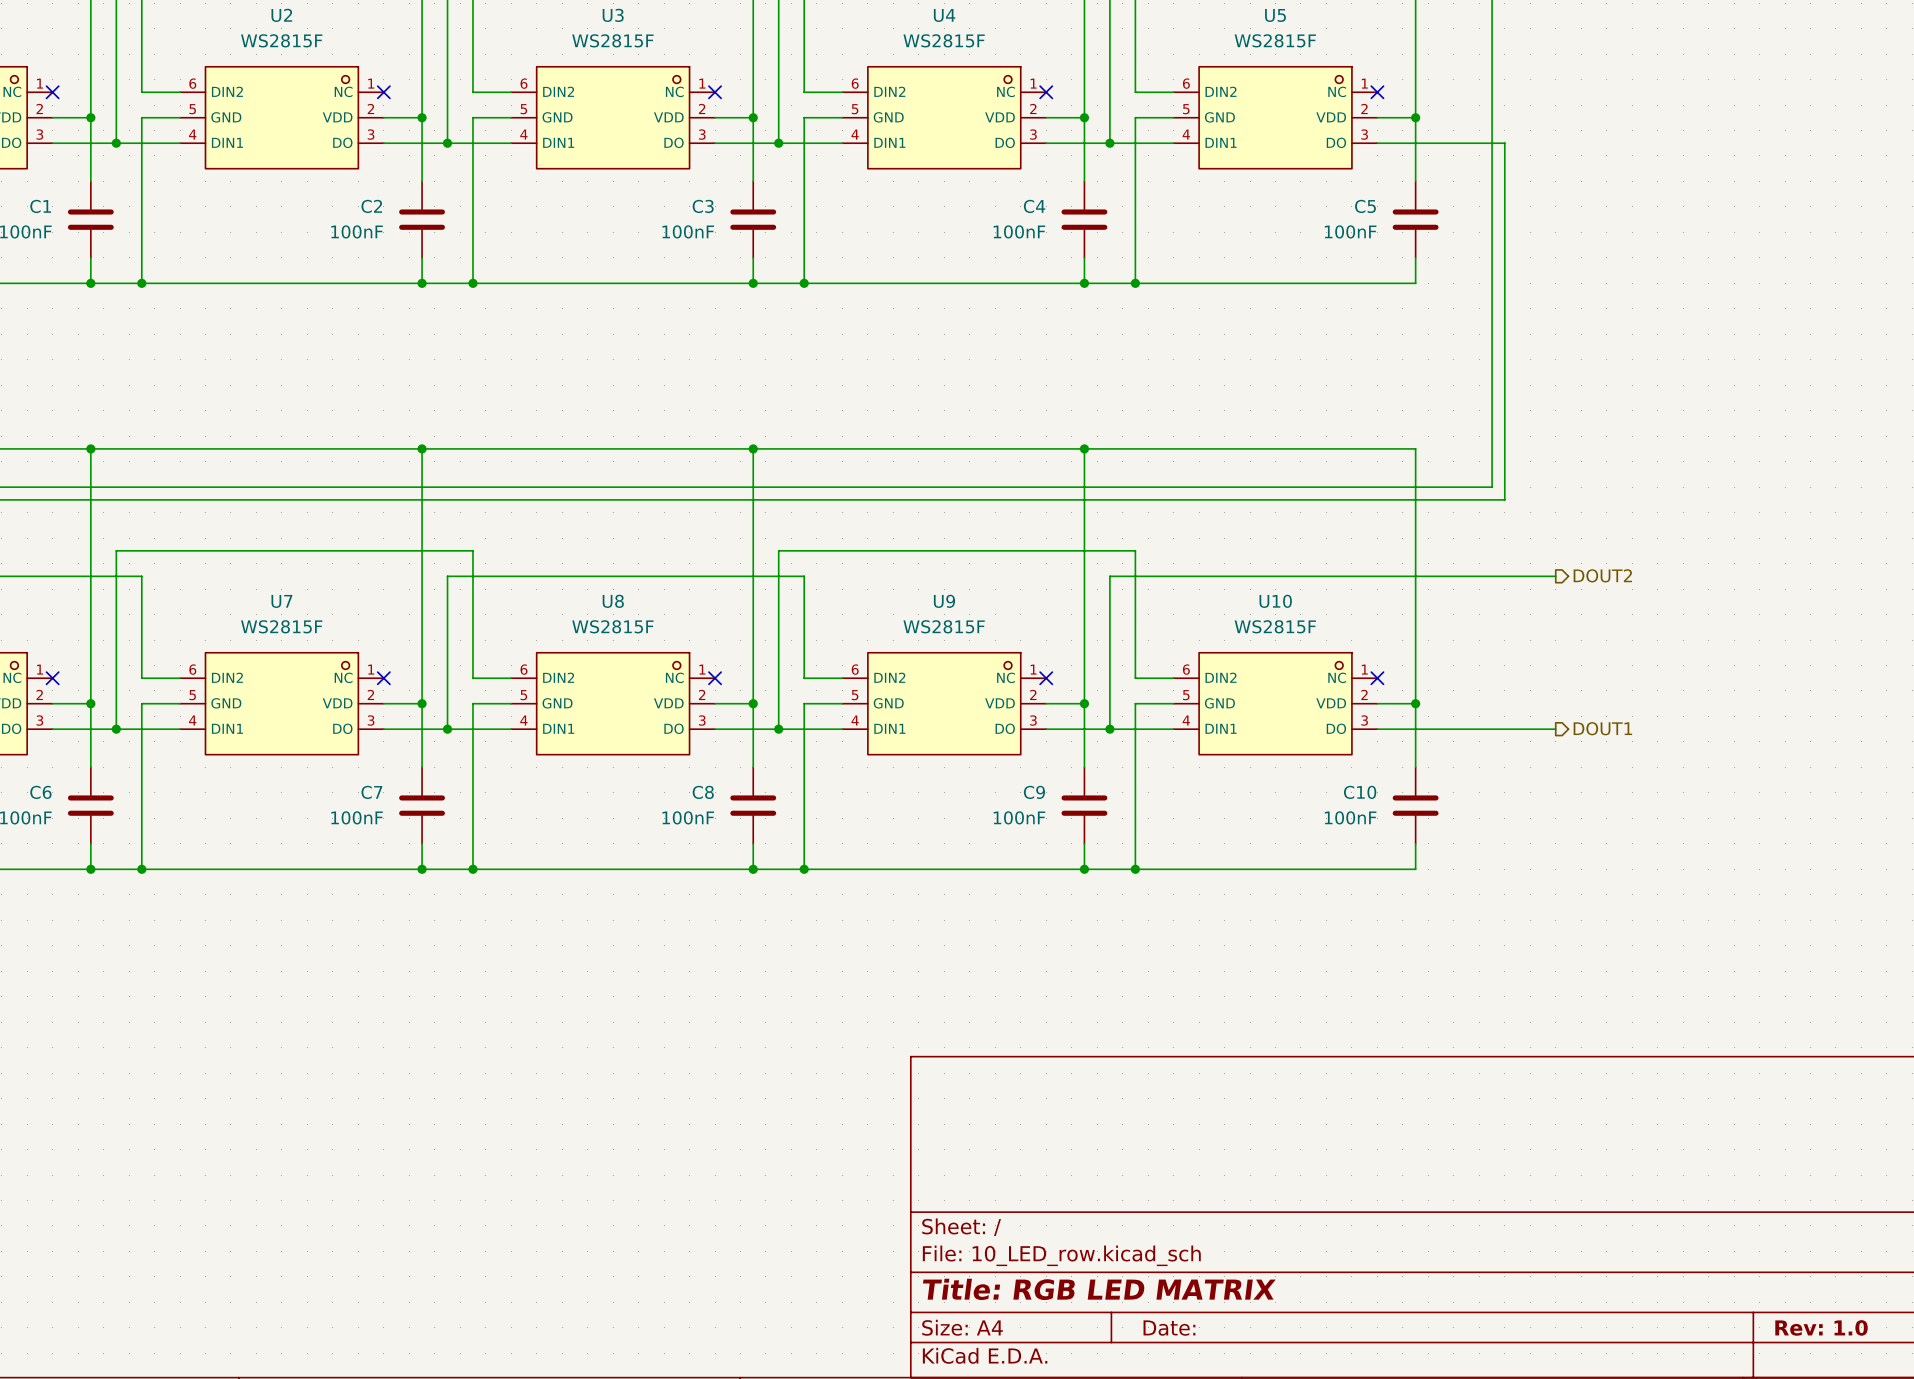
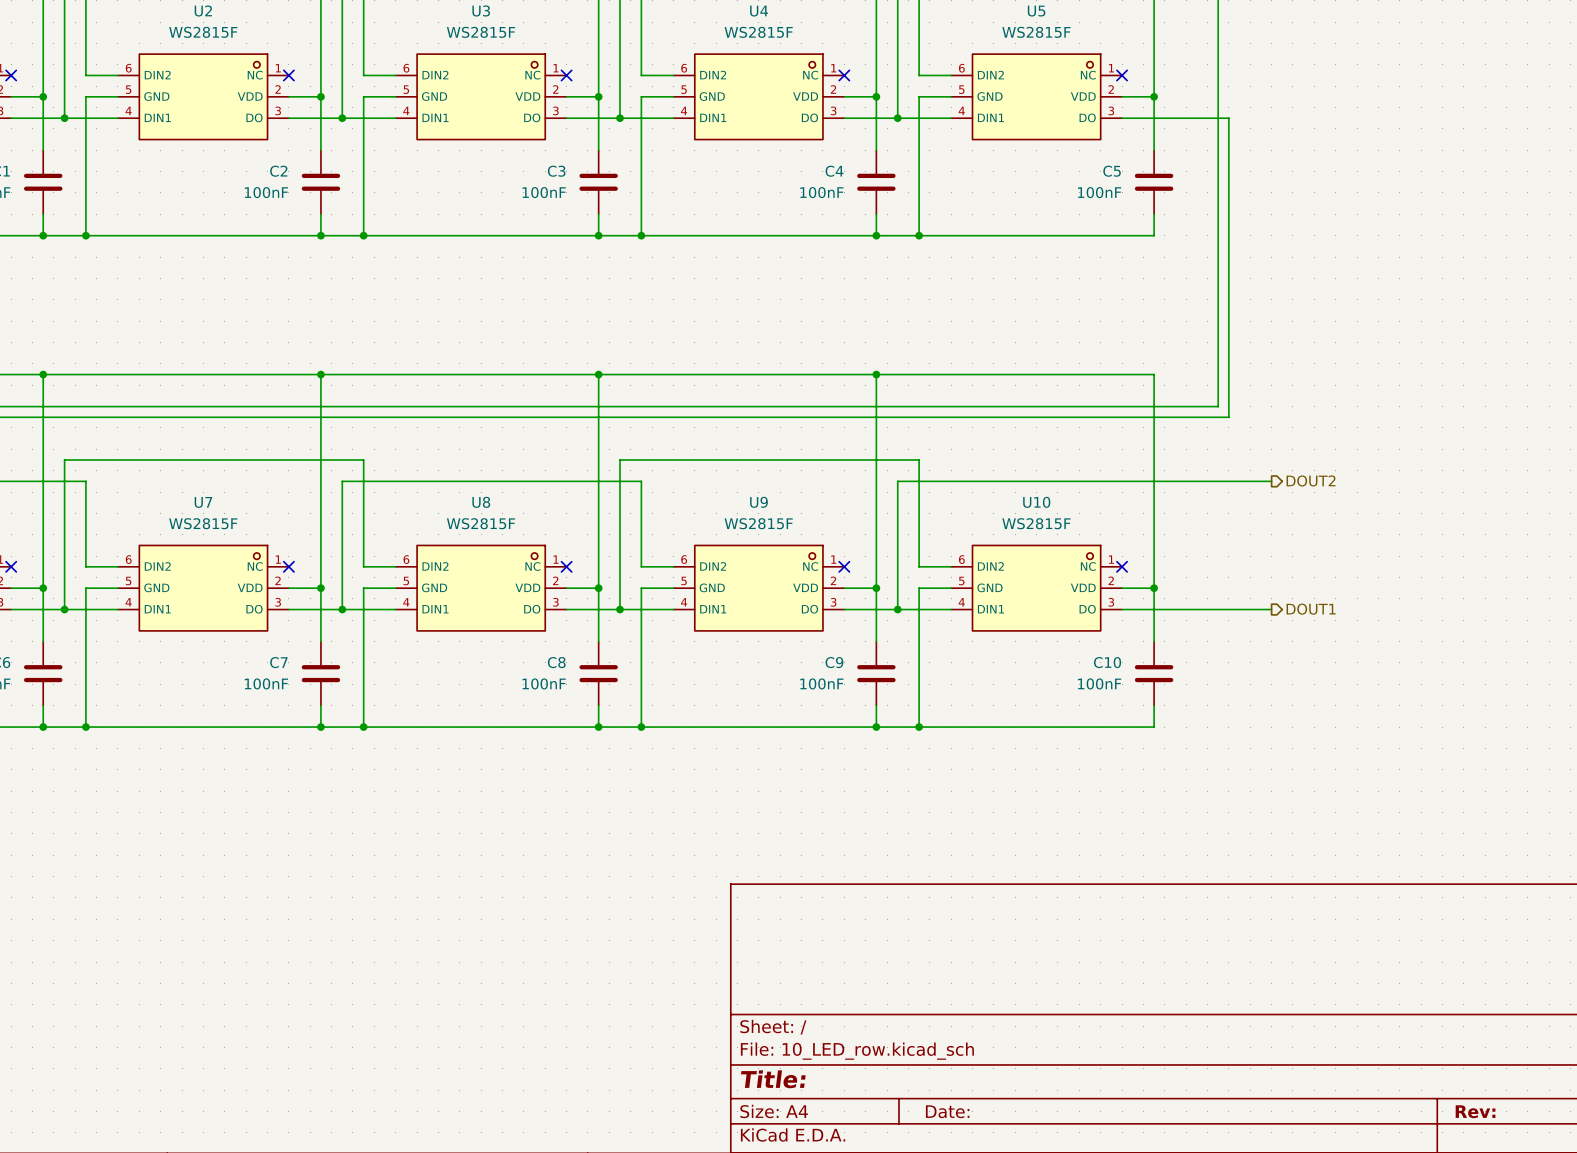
title block: Title: RGB LED MATRIX (1099, 1289) -> Title: (773, 1079)
title block: Rev: 1.0 (1821, 1327) -> Rev: (1475, 1111)

